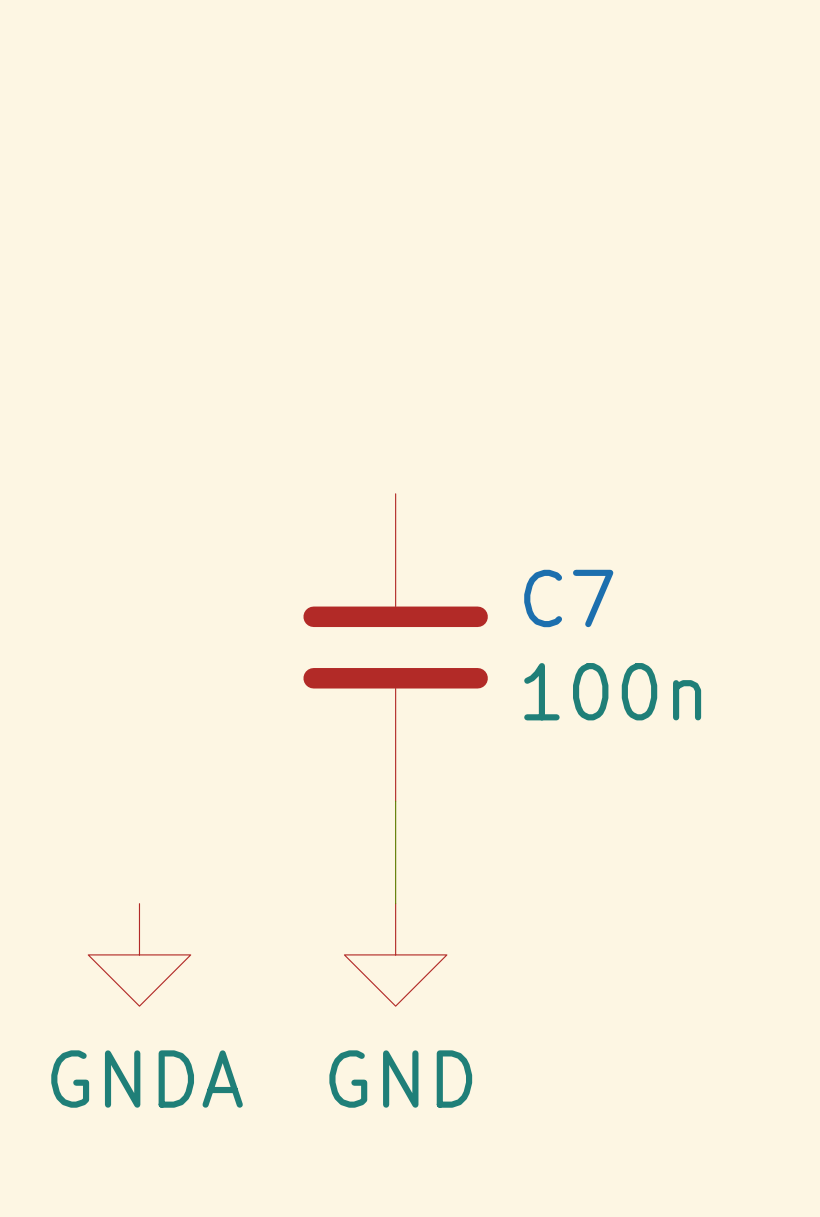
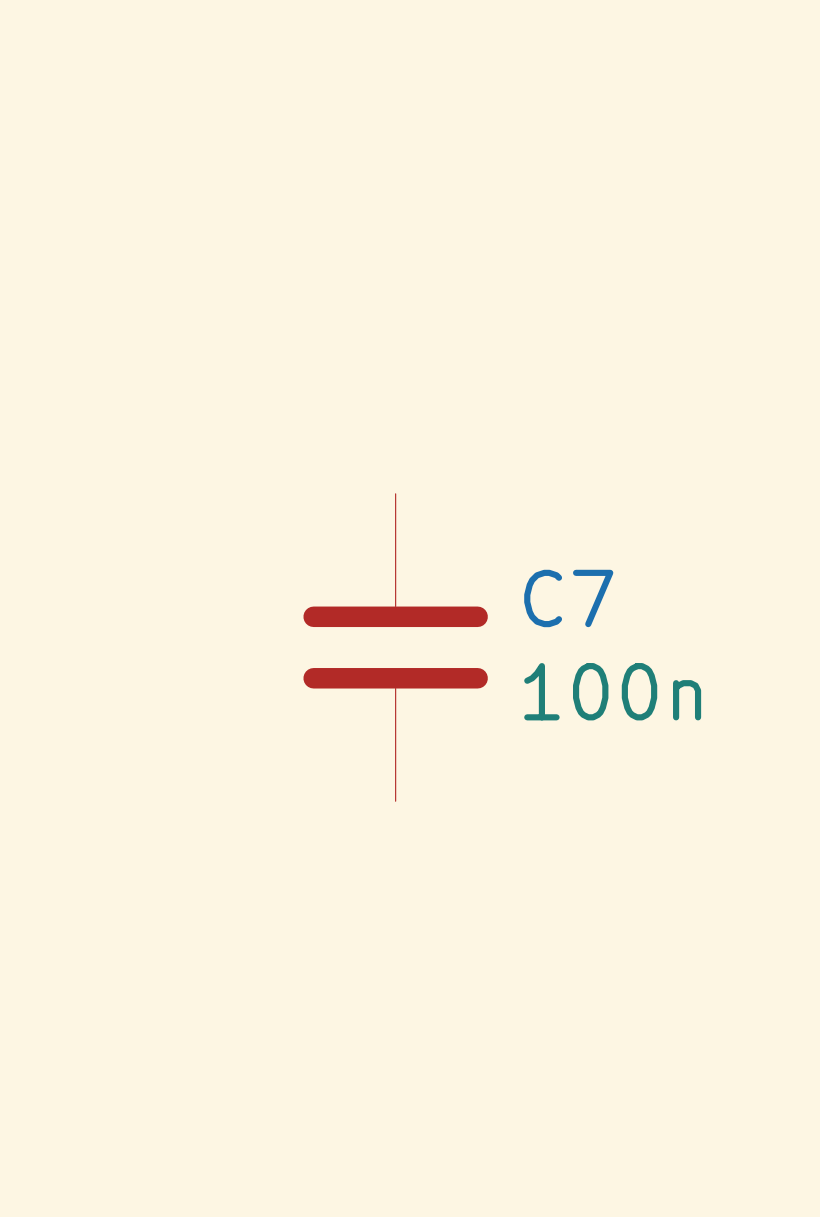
wire: (395, 801) (395, 903) -> none
power symbol: GNDA (139, 954) -> none
power symbol: GND (395, 954) -> none

